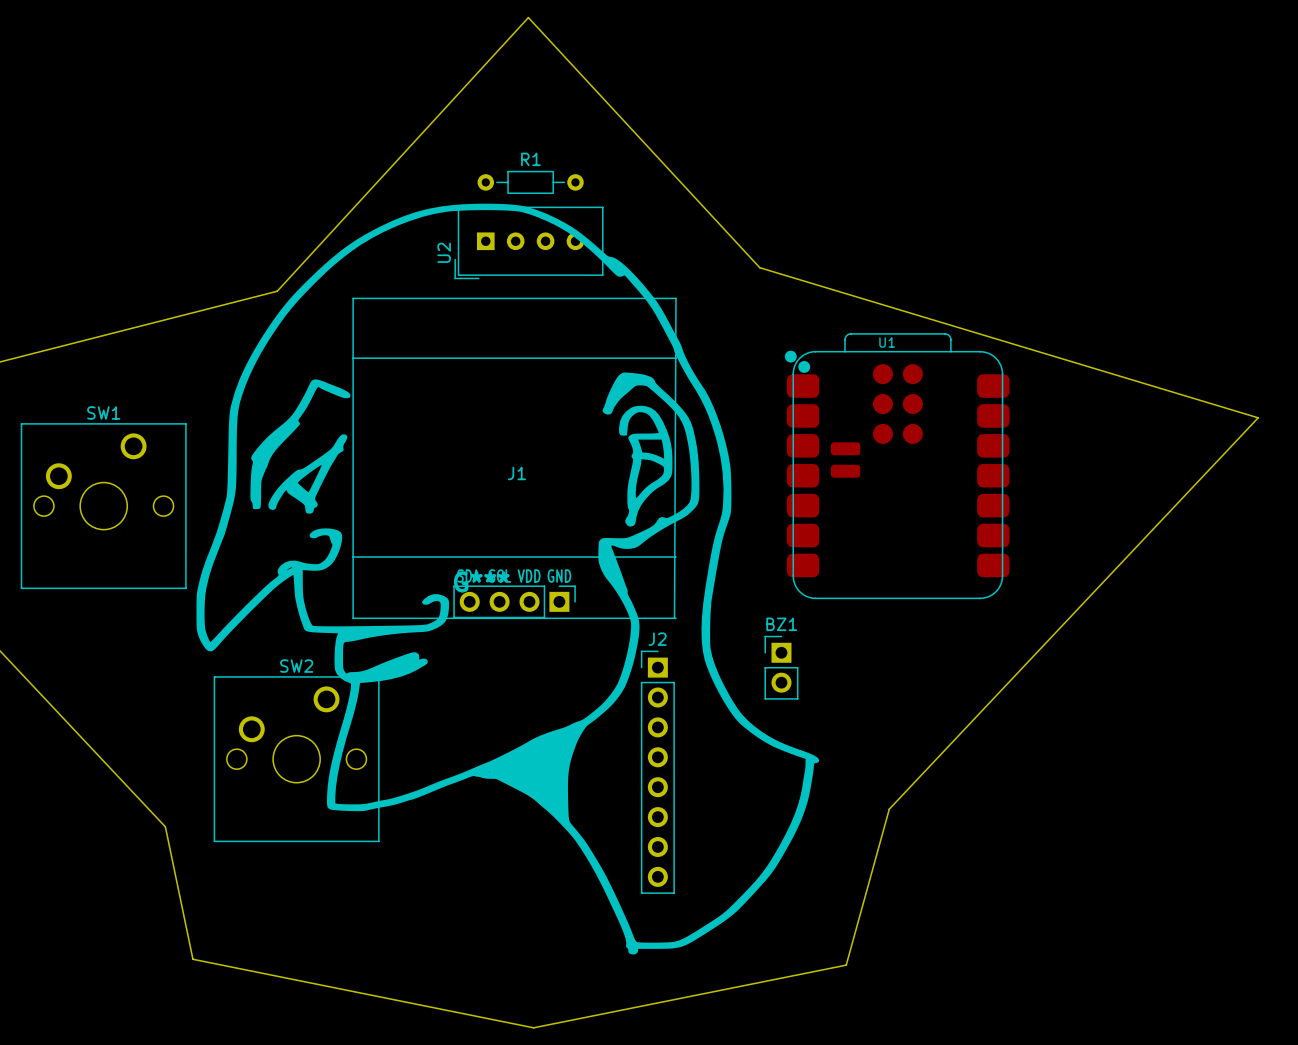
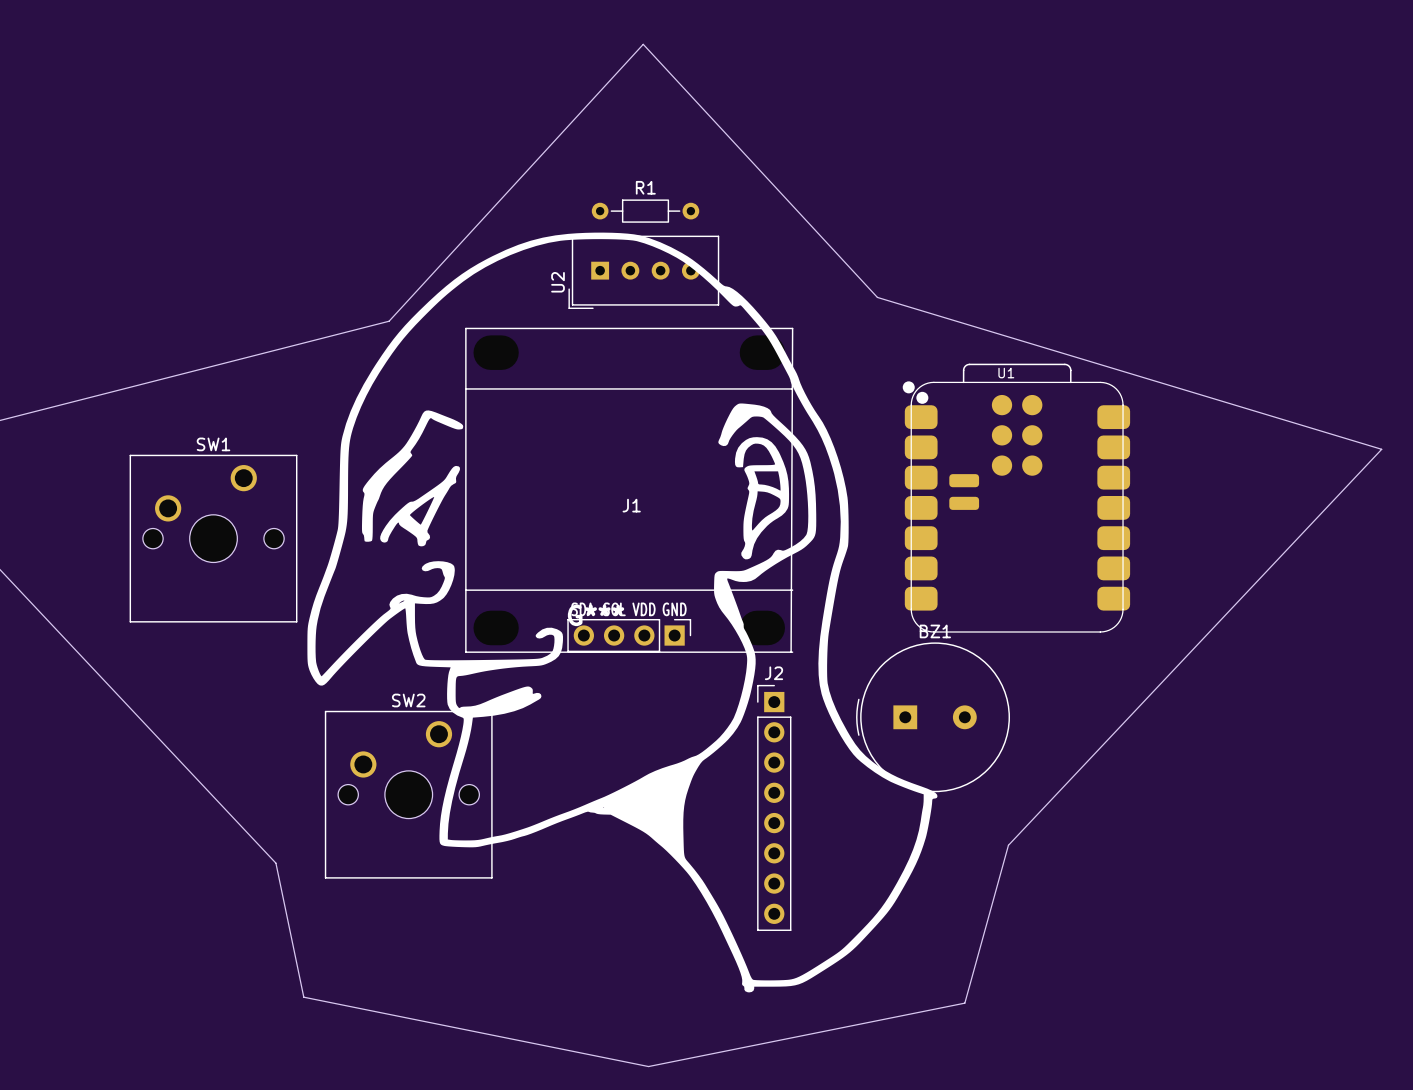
BZ1 name position: BZ1 (781, 624) -> BZ1 (935, 631)
BZ1 footprint: [764, 635, 799, 700] -> [856, 642, 1010, 793]

